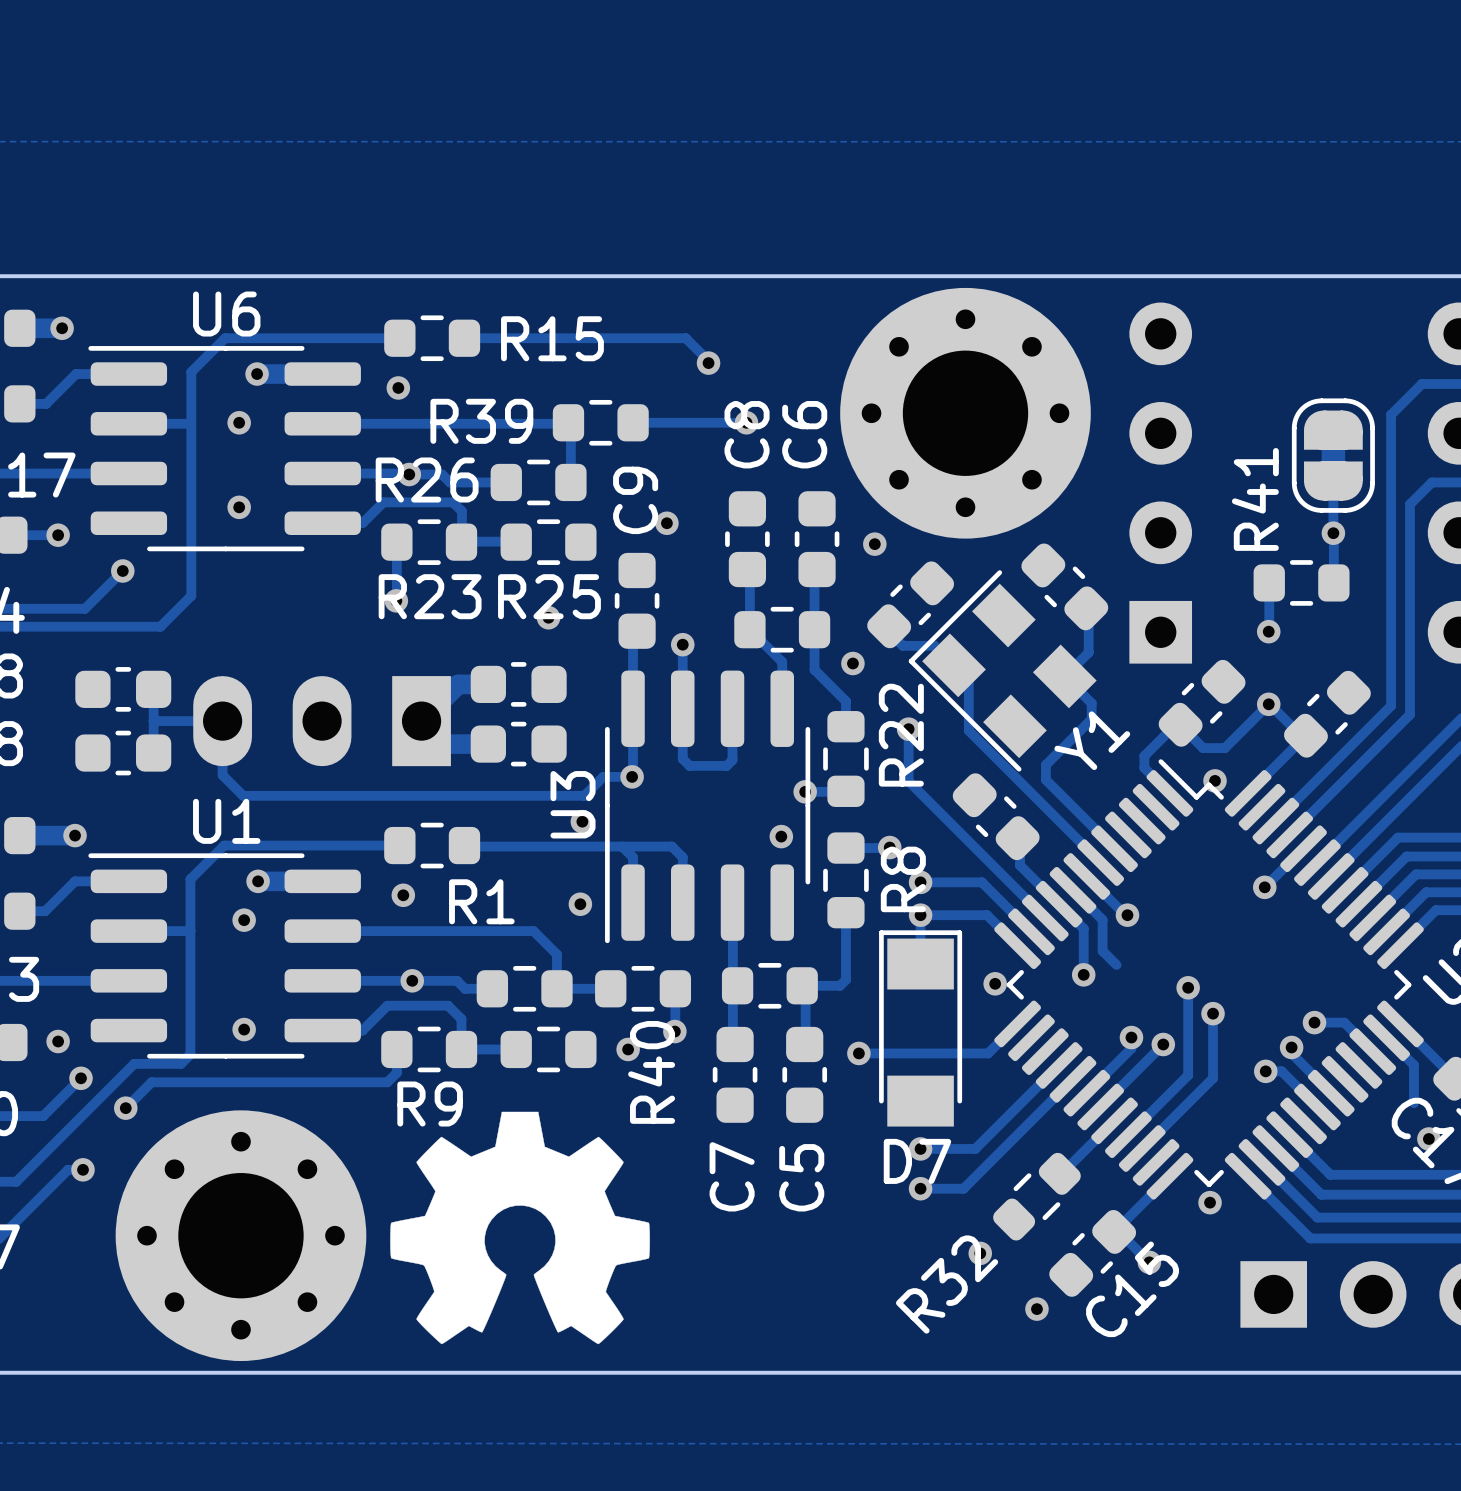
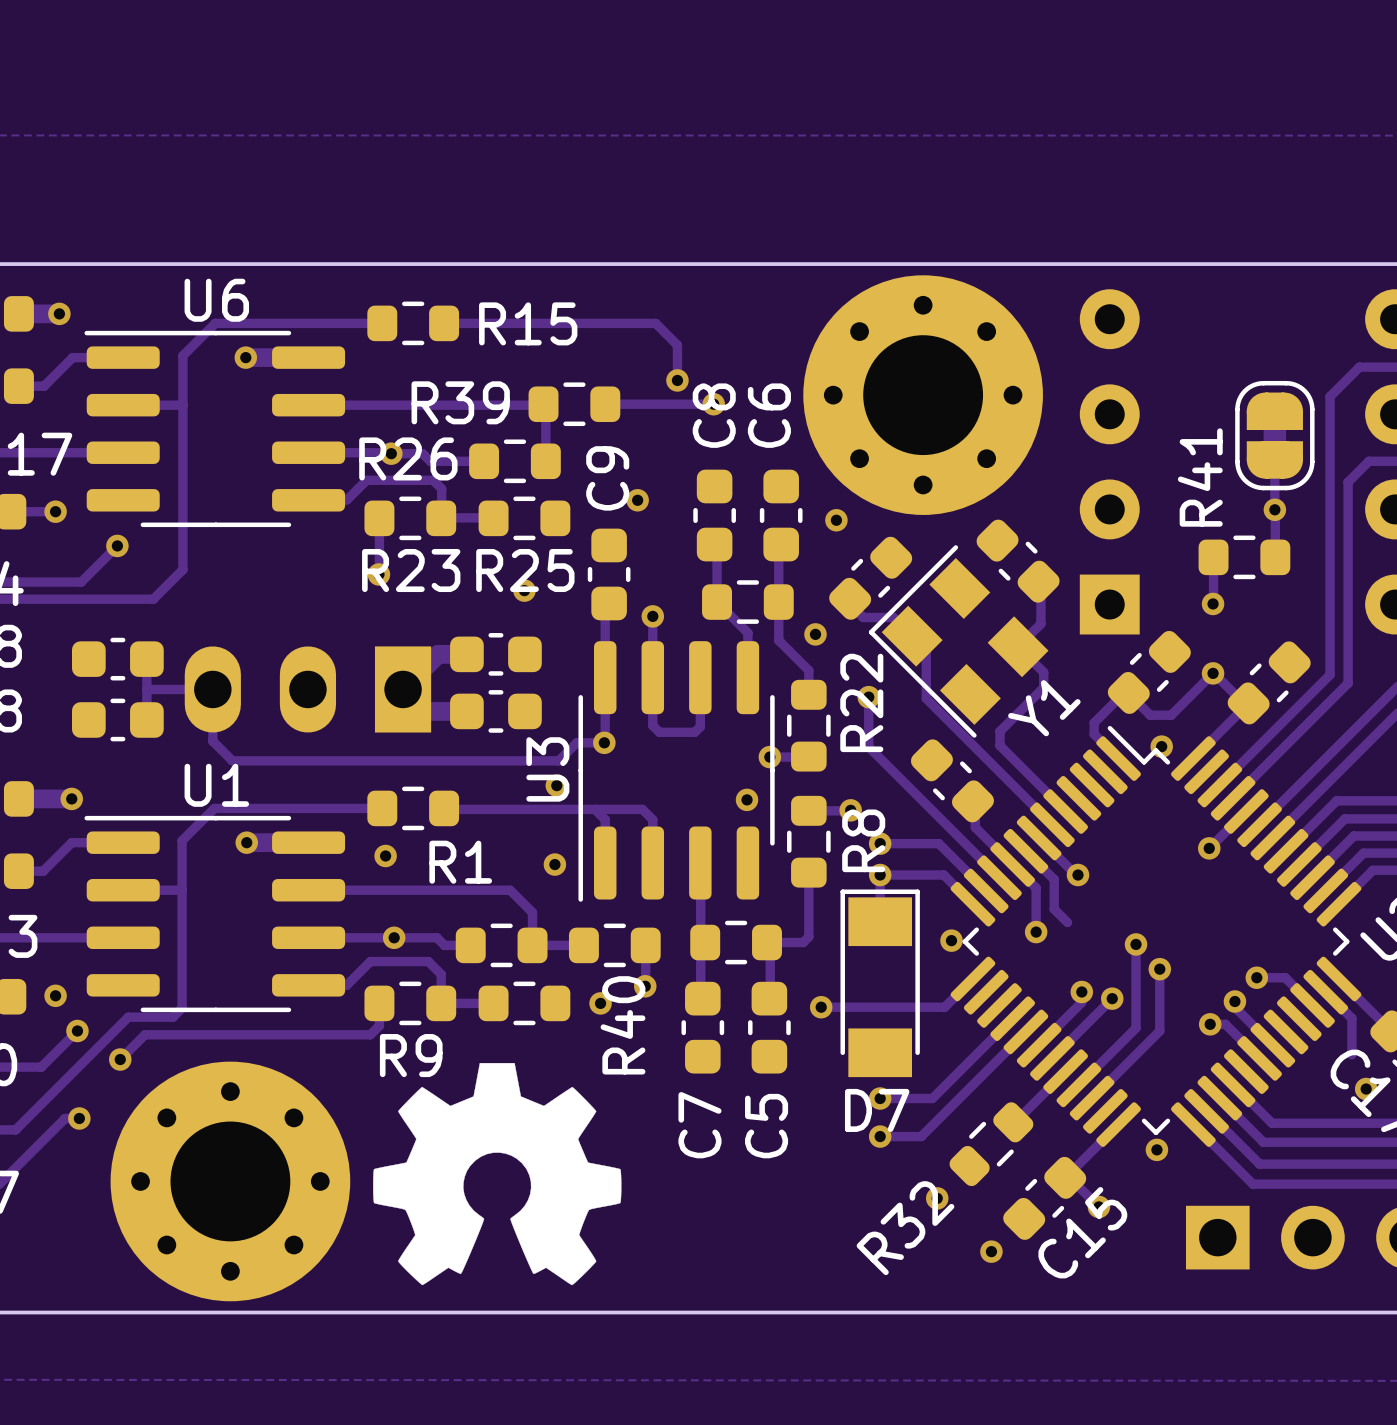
track: none -> (677, 347) (677, 380)
via position: (708, 363) -> (677, 380)
via: (398, 387) -> none
via: (239, 422) -> none
via: (239, 507) -> none
via: (244, 920) -> none
via: (244, 1029) -> none

